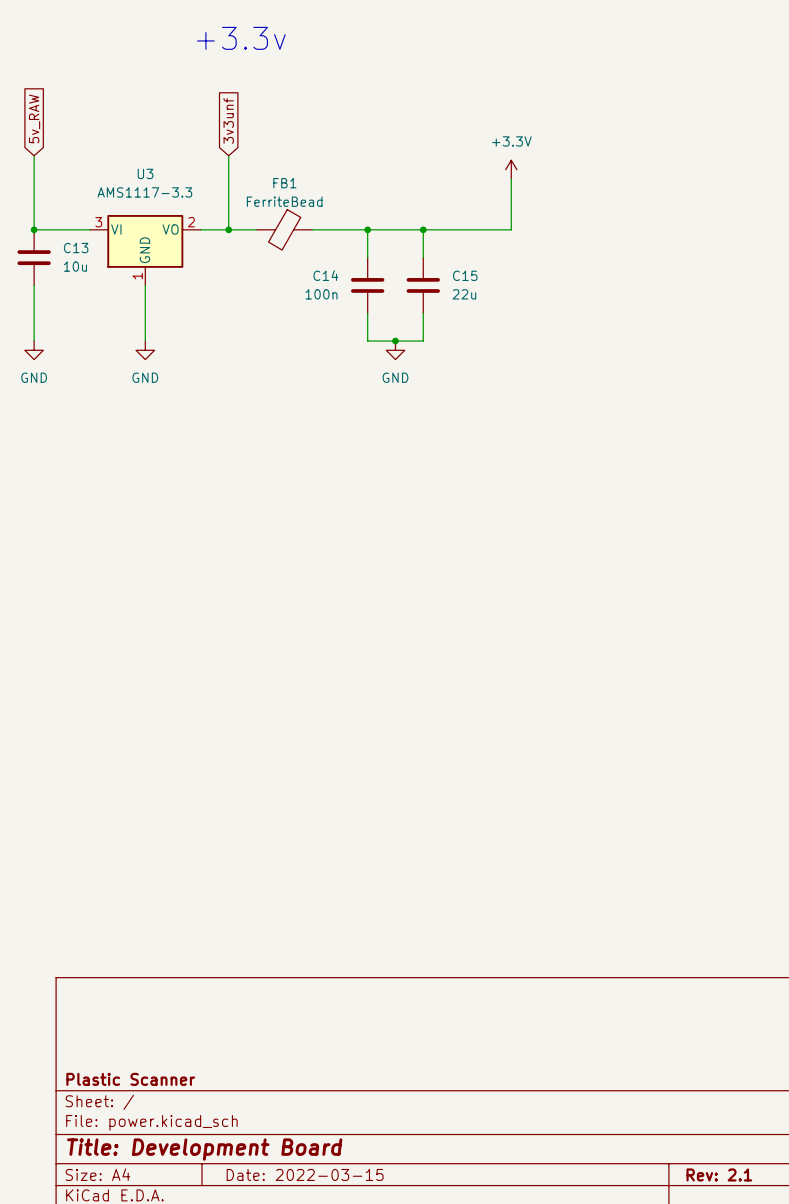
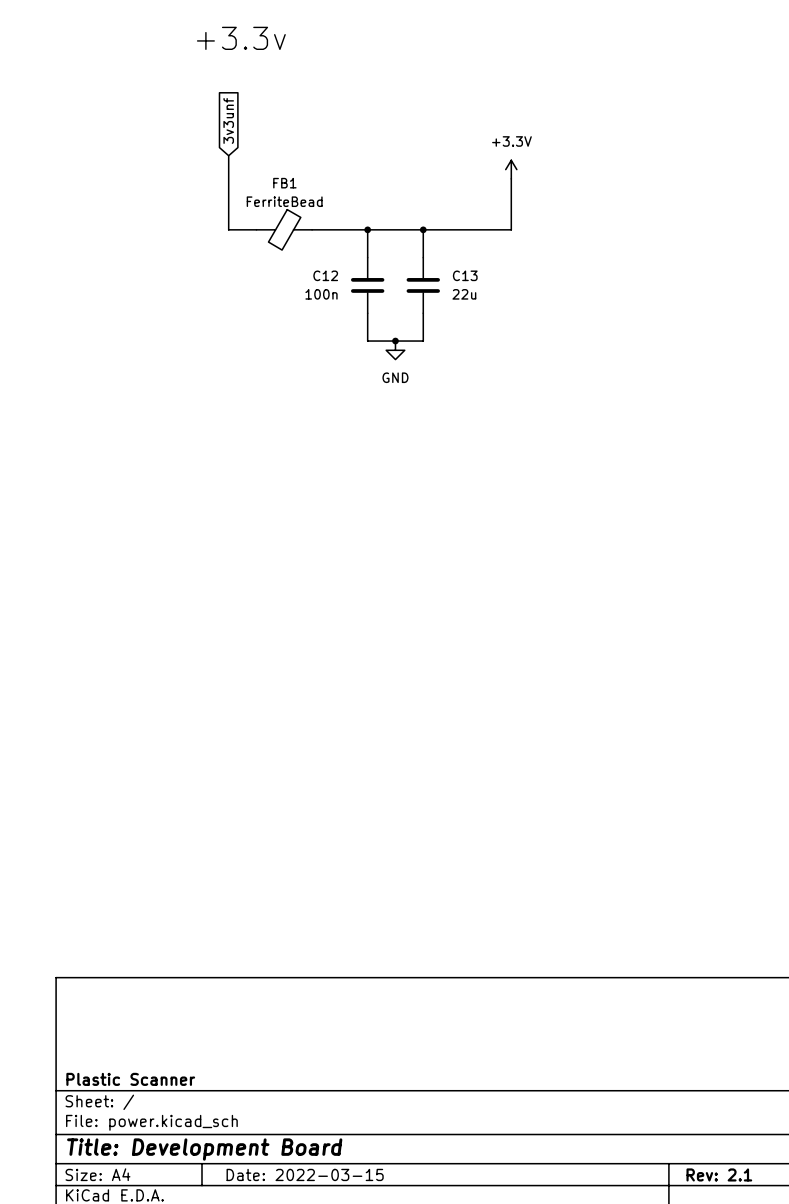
global label: 5v_RAW (34, 118) -> none
wire: (34, 155) (34, 229) (89, 229) -> none
junction: (34, 229) -> none
wire: (200, 229) (228, 229) -> none
junction: (228, 229) -> none
U3: AMS1117-3.3 (145, 250) -> none
C13: 10u (34, 257) -> none
C14 name: C14 (325, 275) -> C12 (325, 275)
C15 name: C15 (465, 275) -> C13 (465, 275)
wire: (34, 285) (34, 341) -> none
wire: (145, 285) (145, 341) -> none
power symbol: GND (34, 350) -> none
power symbol: GND (145, 350) -> none

